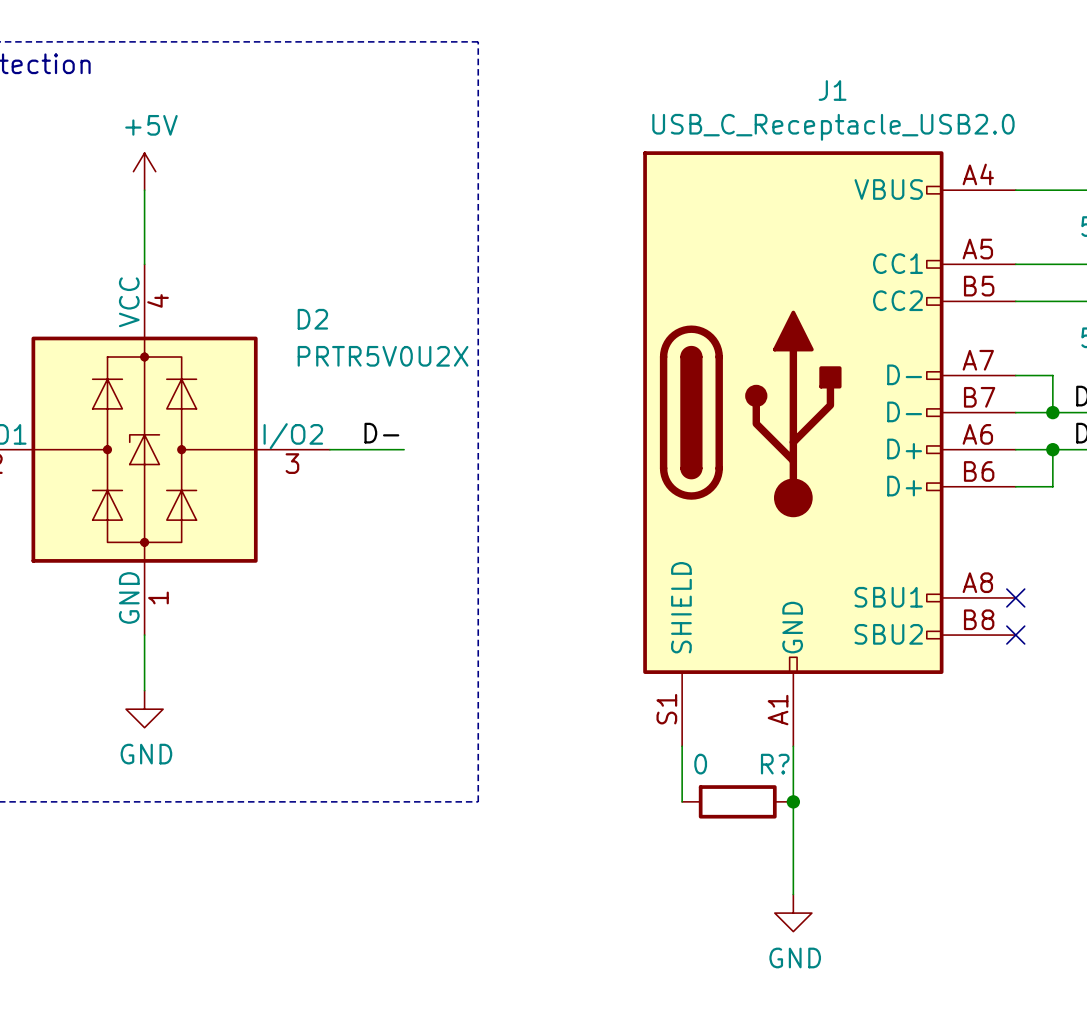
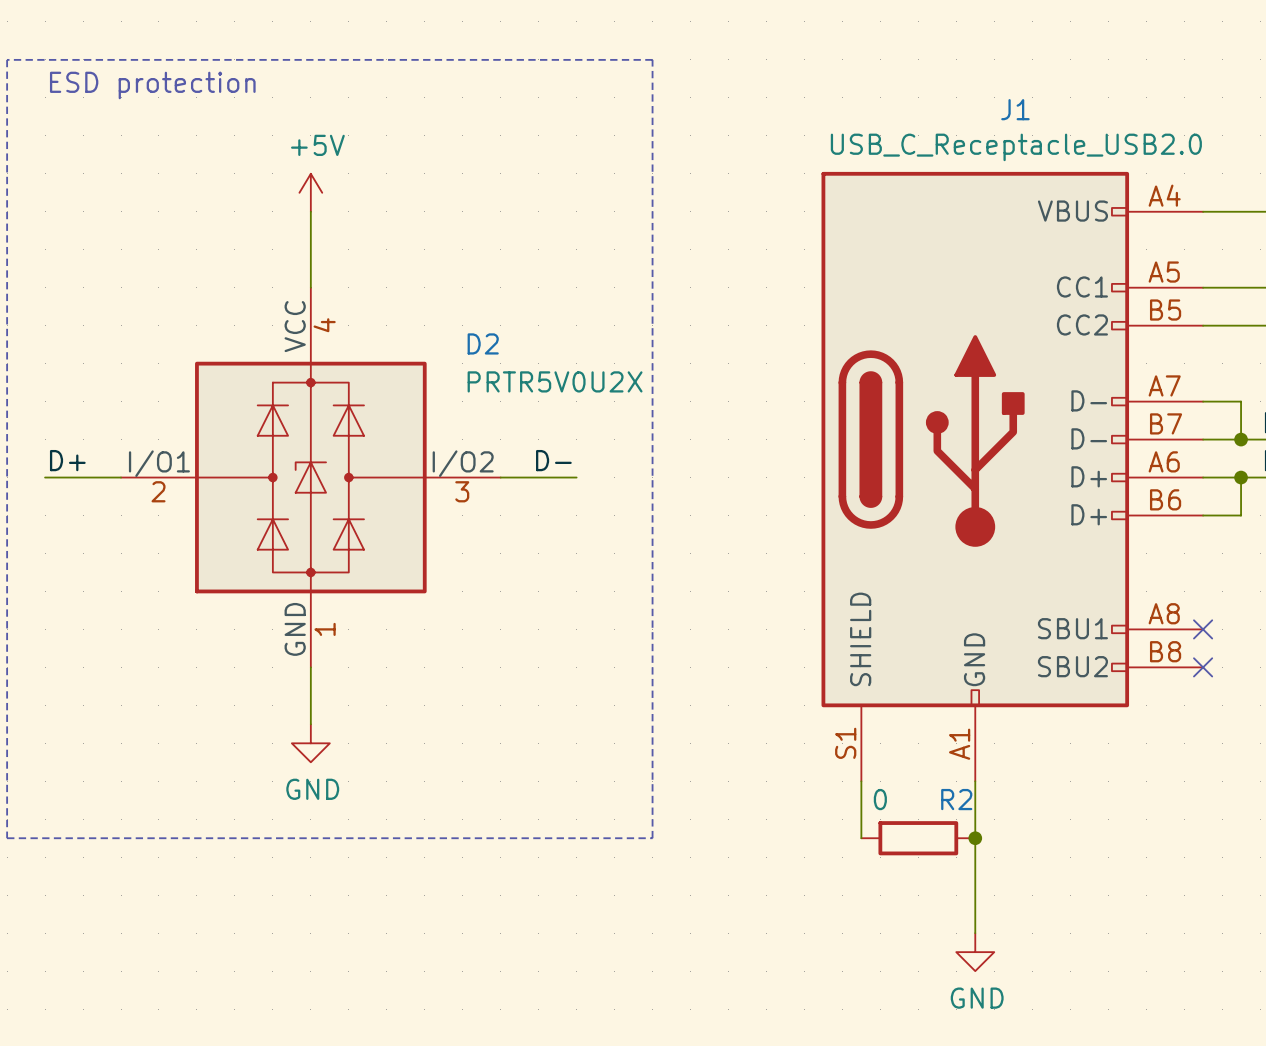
R? name: R? (775, 764) -> R2 (956, 799)

